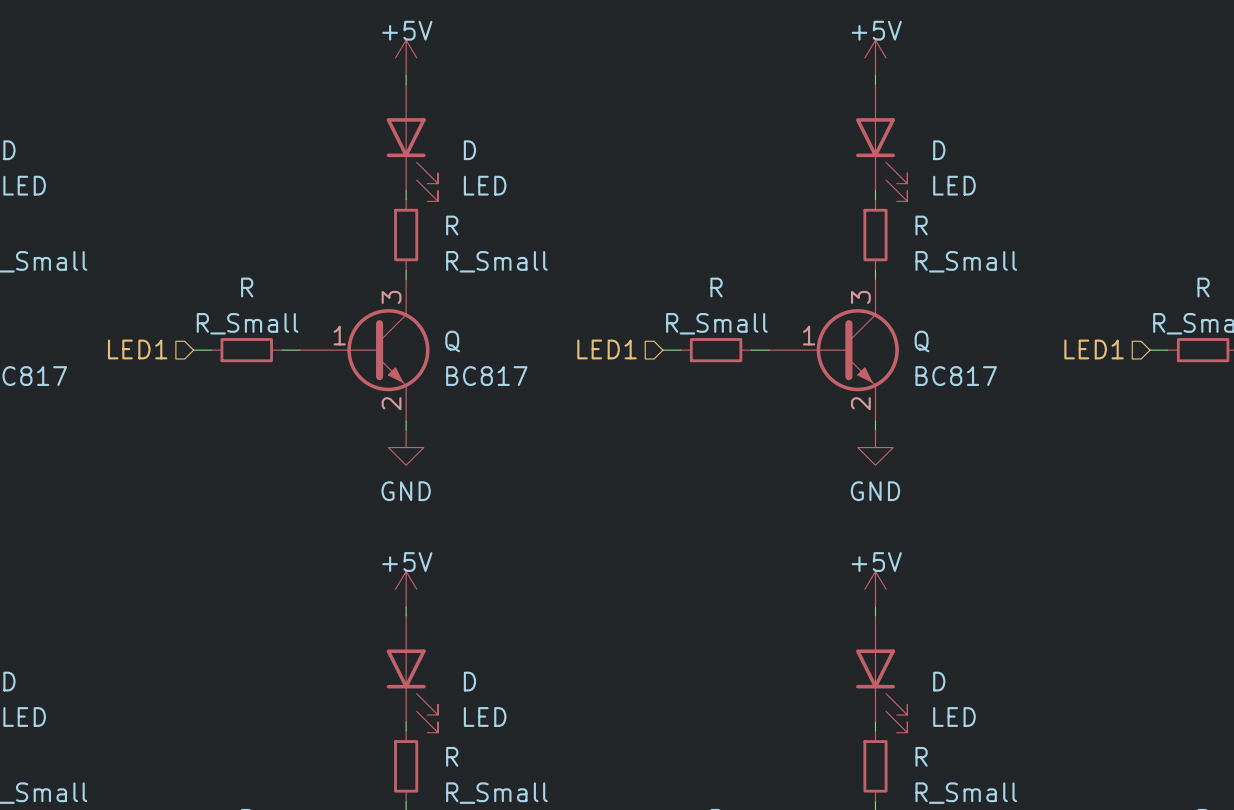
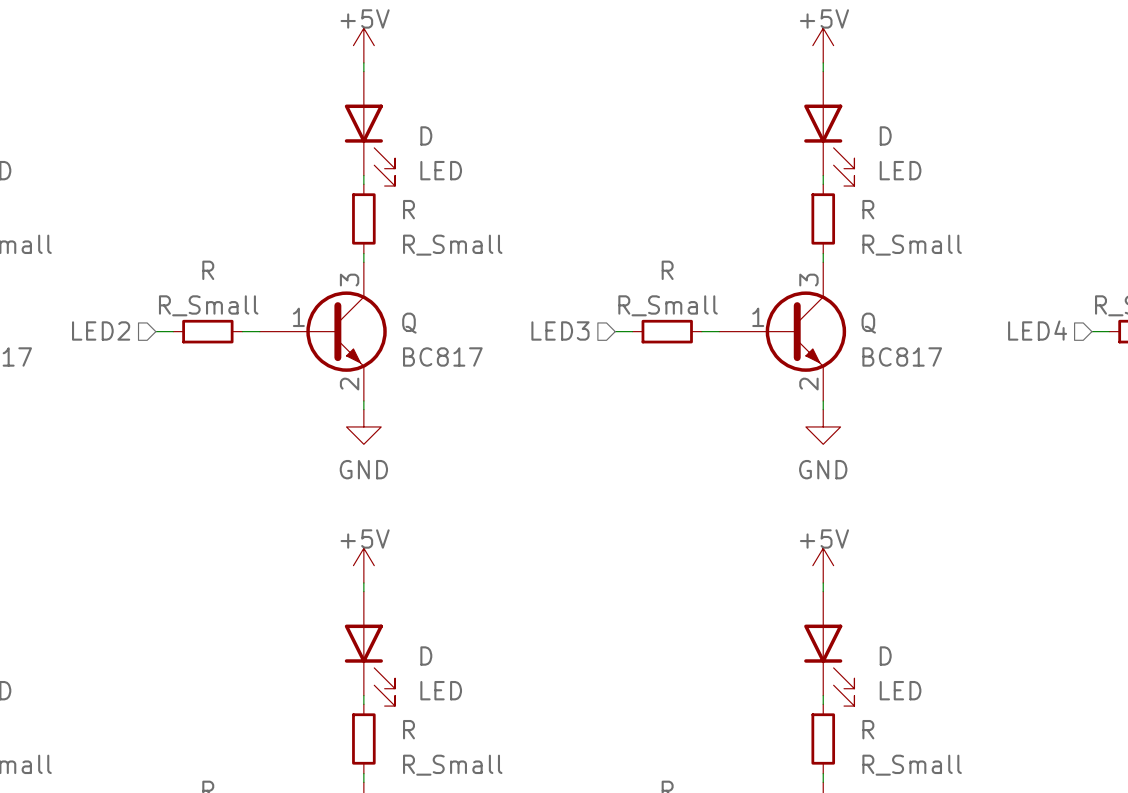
hierarchical label: LED1 (137, 349) -> LED2 (101, 330)
hierarchical label: LED1 (607, 349) -> LED3 (560, 330)
hierarchical label: LED1 (1094, 349) -> LED4 (1037, 330)

